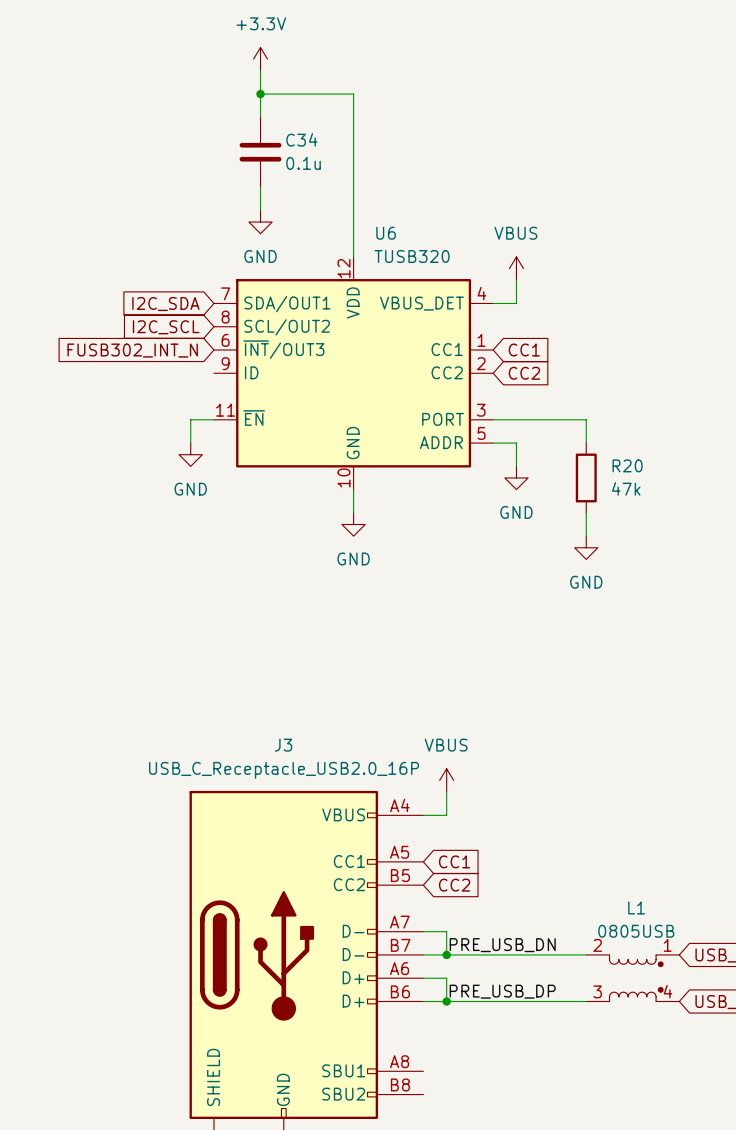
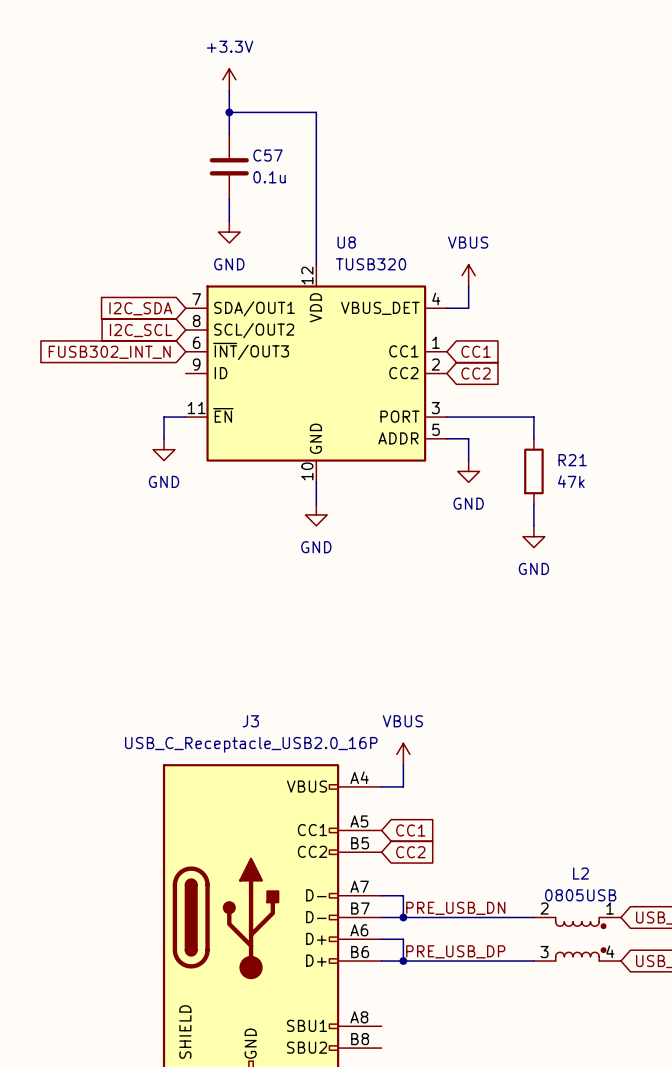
C34 name: C34 (301, 139) -> C57 (267, 155)
U6 name: U6 (386, 233) -> U8 (346, 242)
R20 name: R20 (627, 465) -> R21 (572, 460)
L1 name: L1 (636, 907) -> L2 (580, 873)

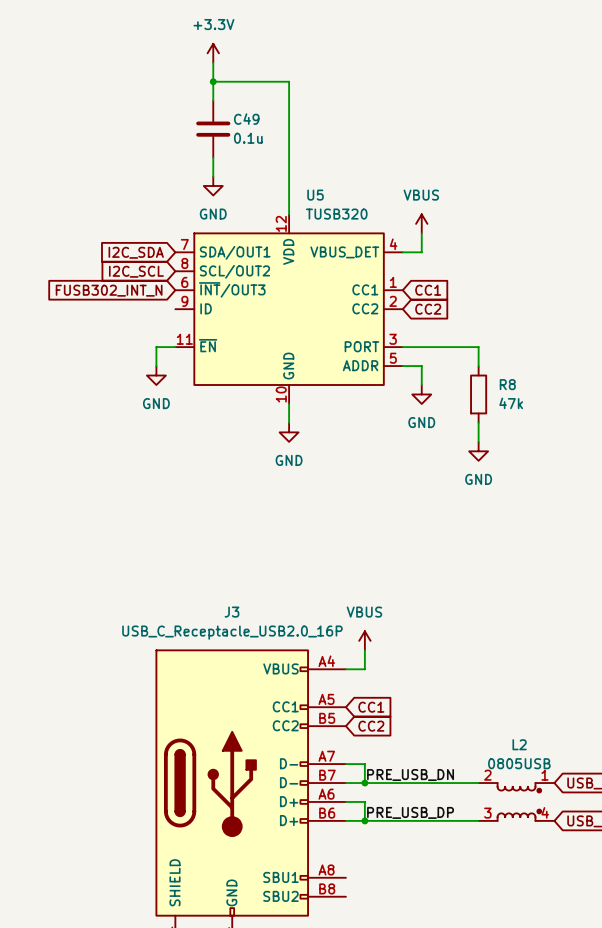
C57 name: C57 (267, 155) -> C49 (246, 119)
U8 name: U8 (346, 242) -> U5 (315, 195)
R21 name: R21 (572, 460) -> R8 (507, 384)

